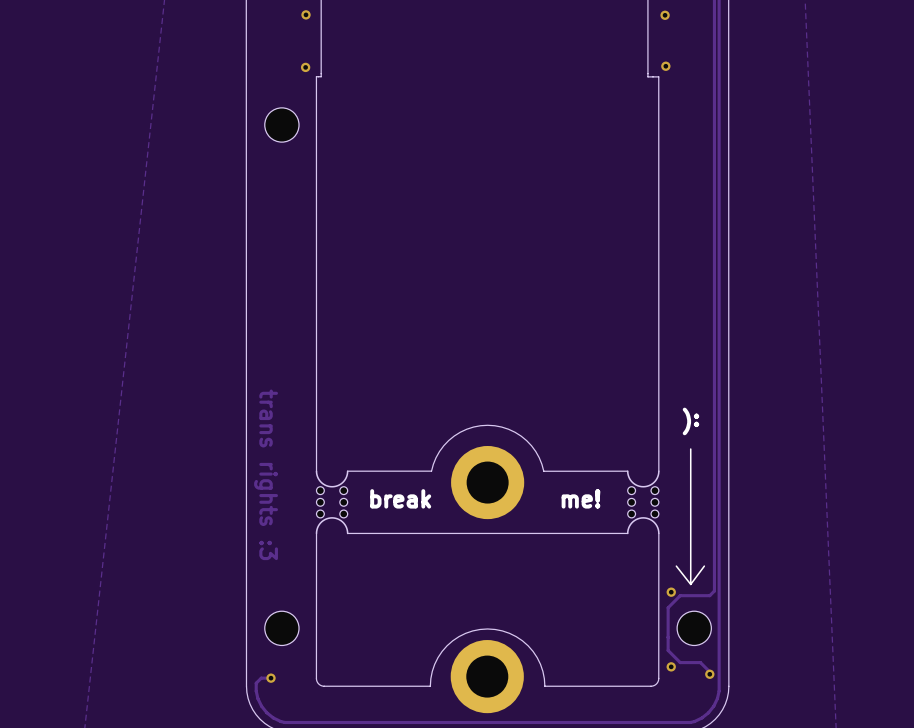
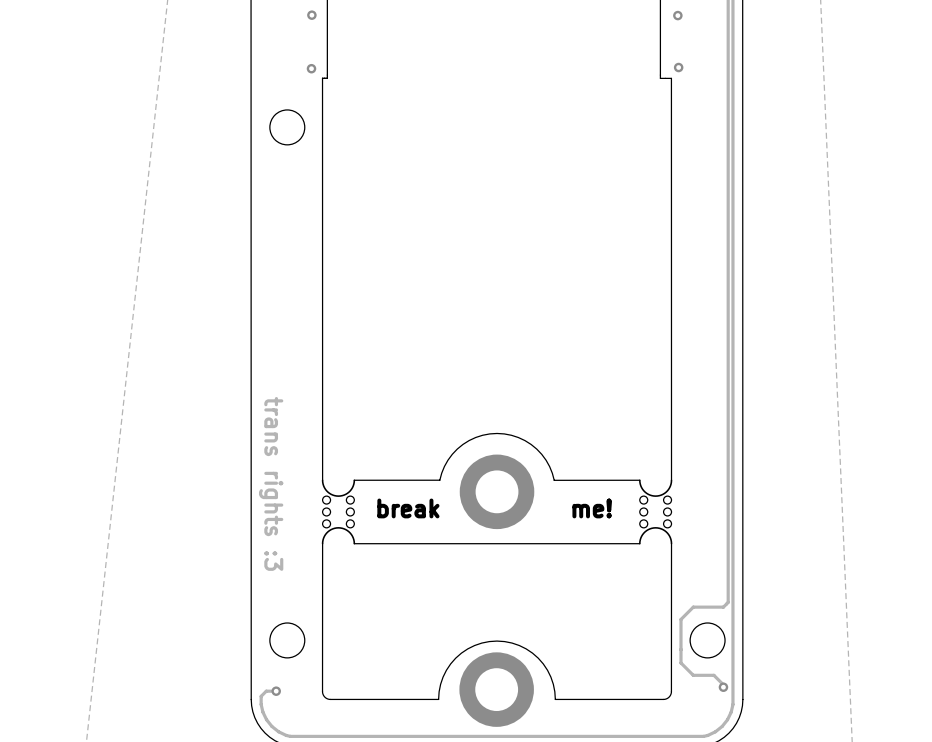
text: :( (690, 421) -> none
line: (690, 449) (690, 584) -> none
line: (676, 566) (690, 584) -> none
line: (704, 566) (690, 584) -> none
via: (671, 592) -> none
via: (671, 666) -> none

